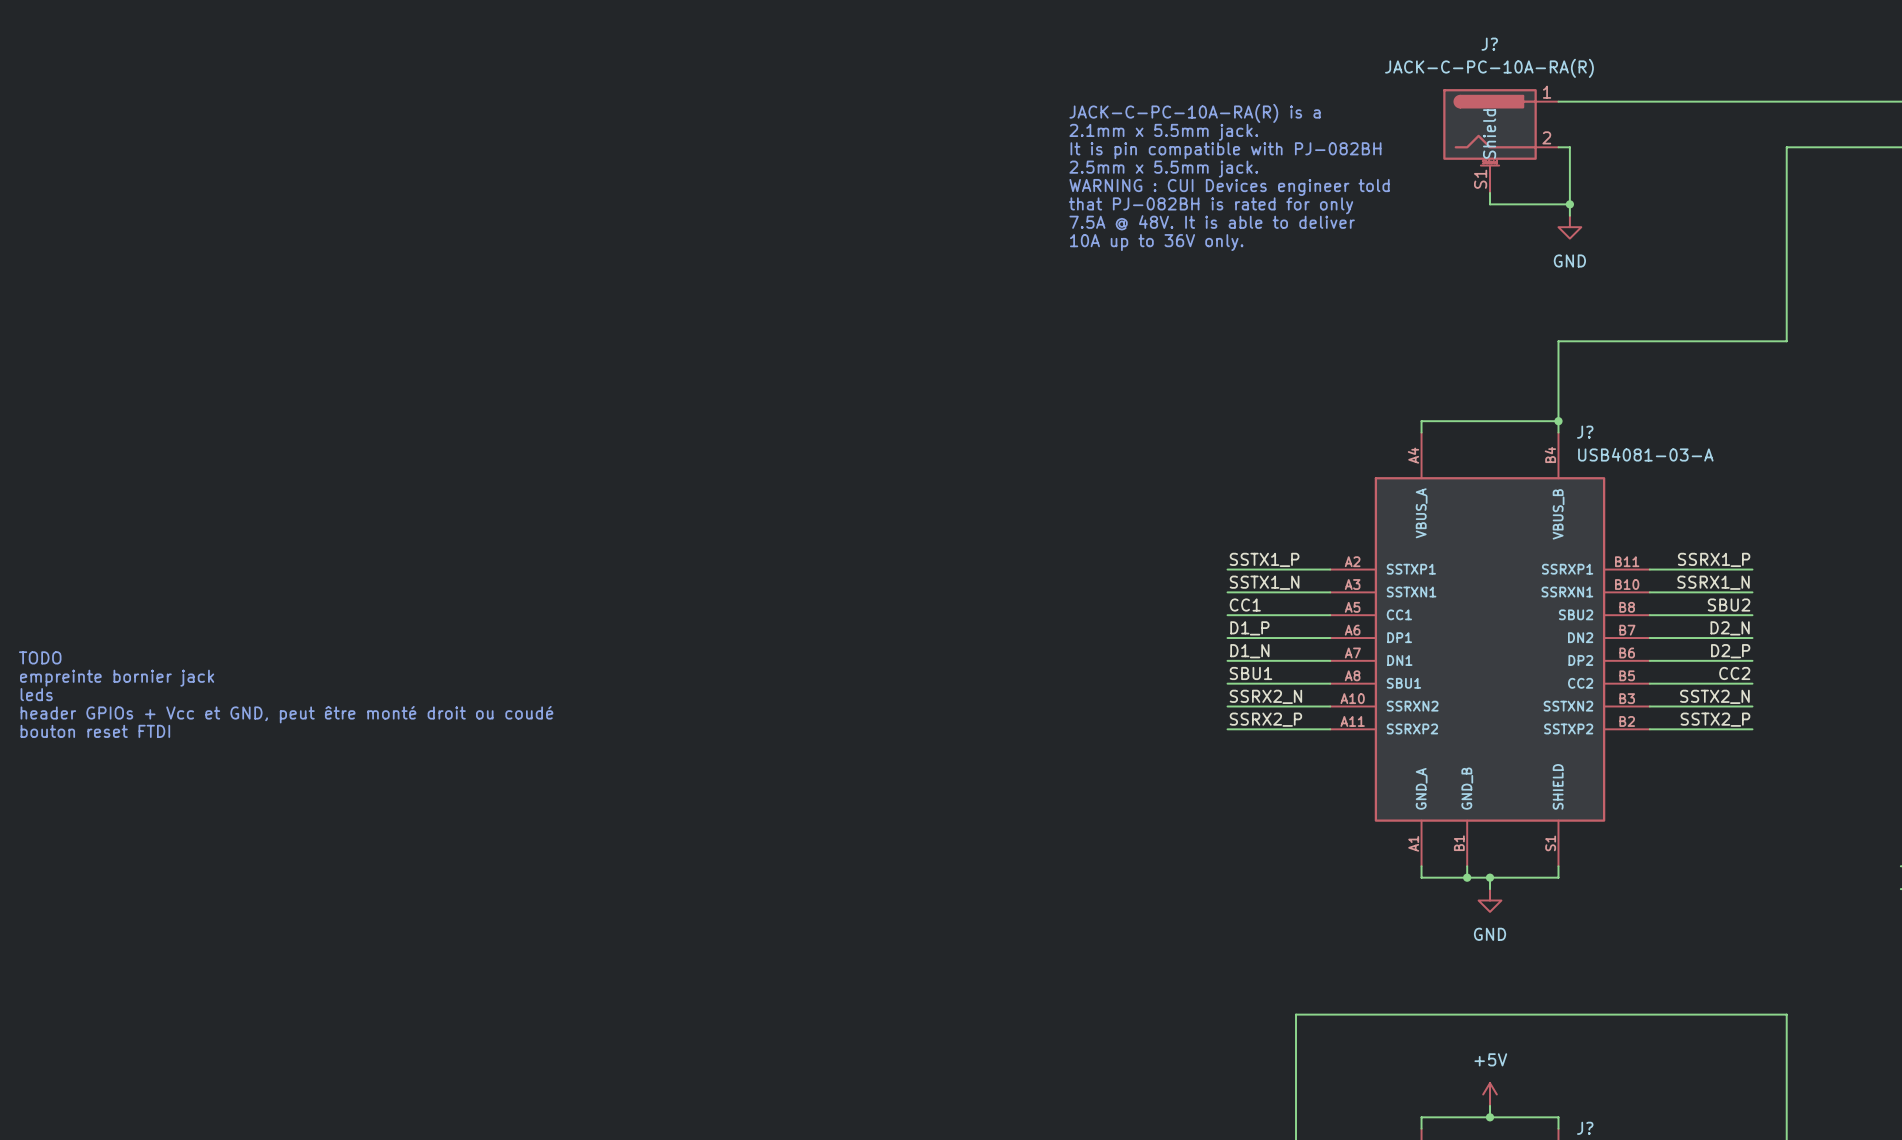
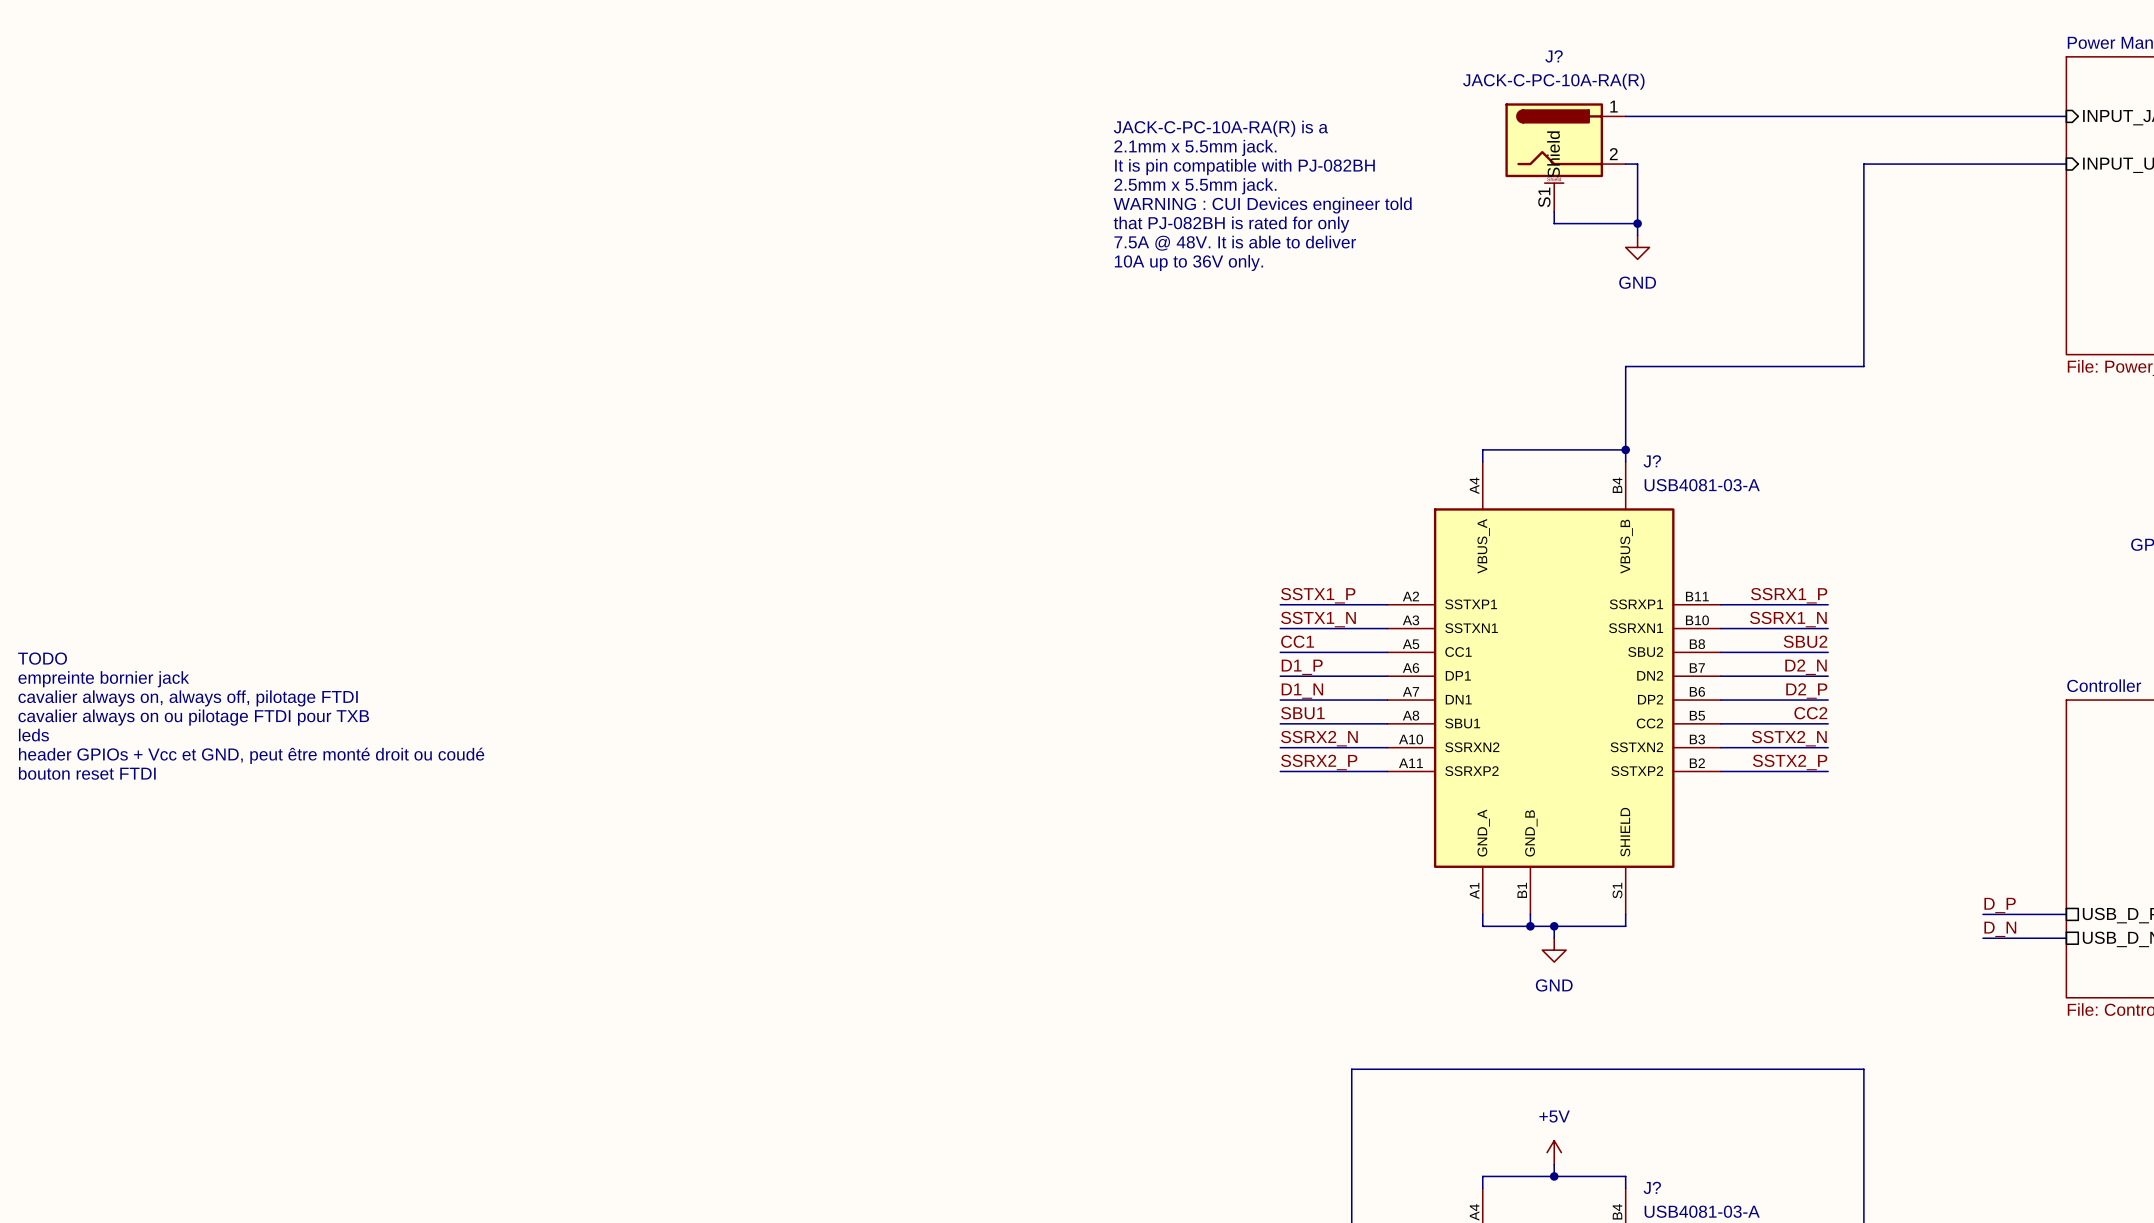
text: none -> TODO (42, 658)
text: none -> empreinte bornier jack (103, 679)
text: TODO (40, 657) -> cavalier always on, always off, pilotage FTDI (188, 698)
text: empreinte bornier jack (117, 678) -> cavalier always on ou pilotage FTDI pour TXB (193, 717)

